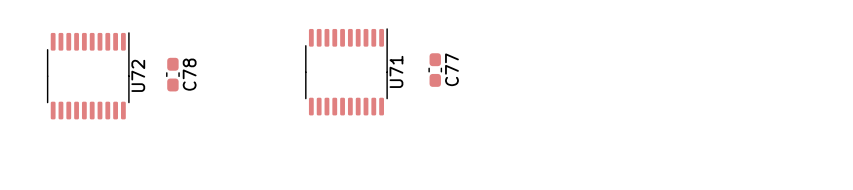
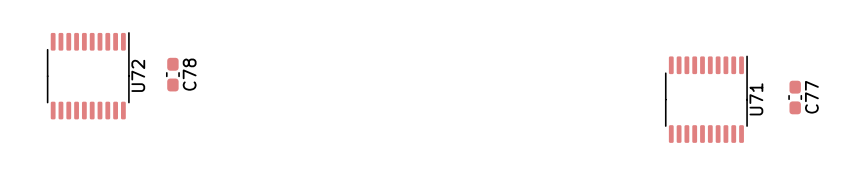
C77 position: (435, 70) -> (795, 97)
U71 position: (346, 71) -> (706, 99)

